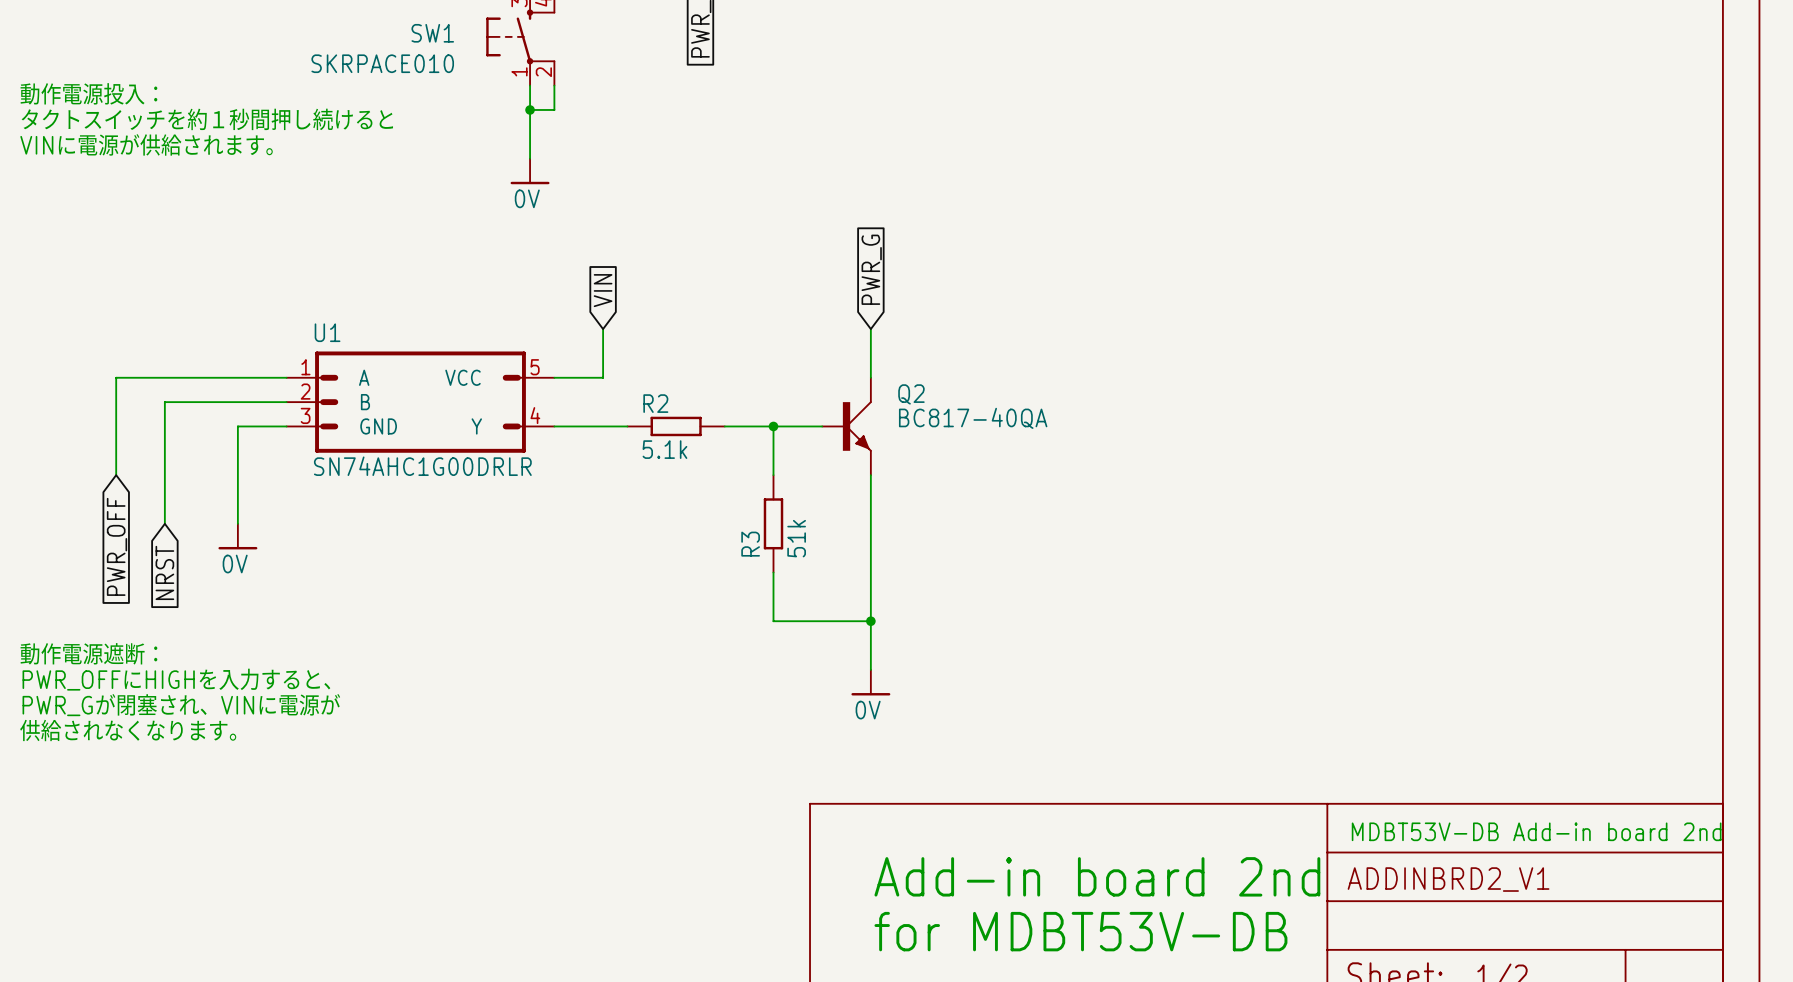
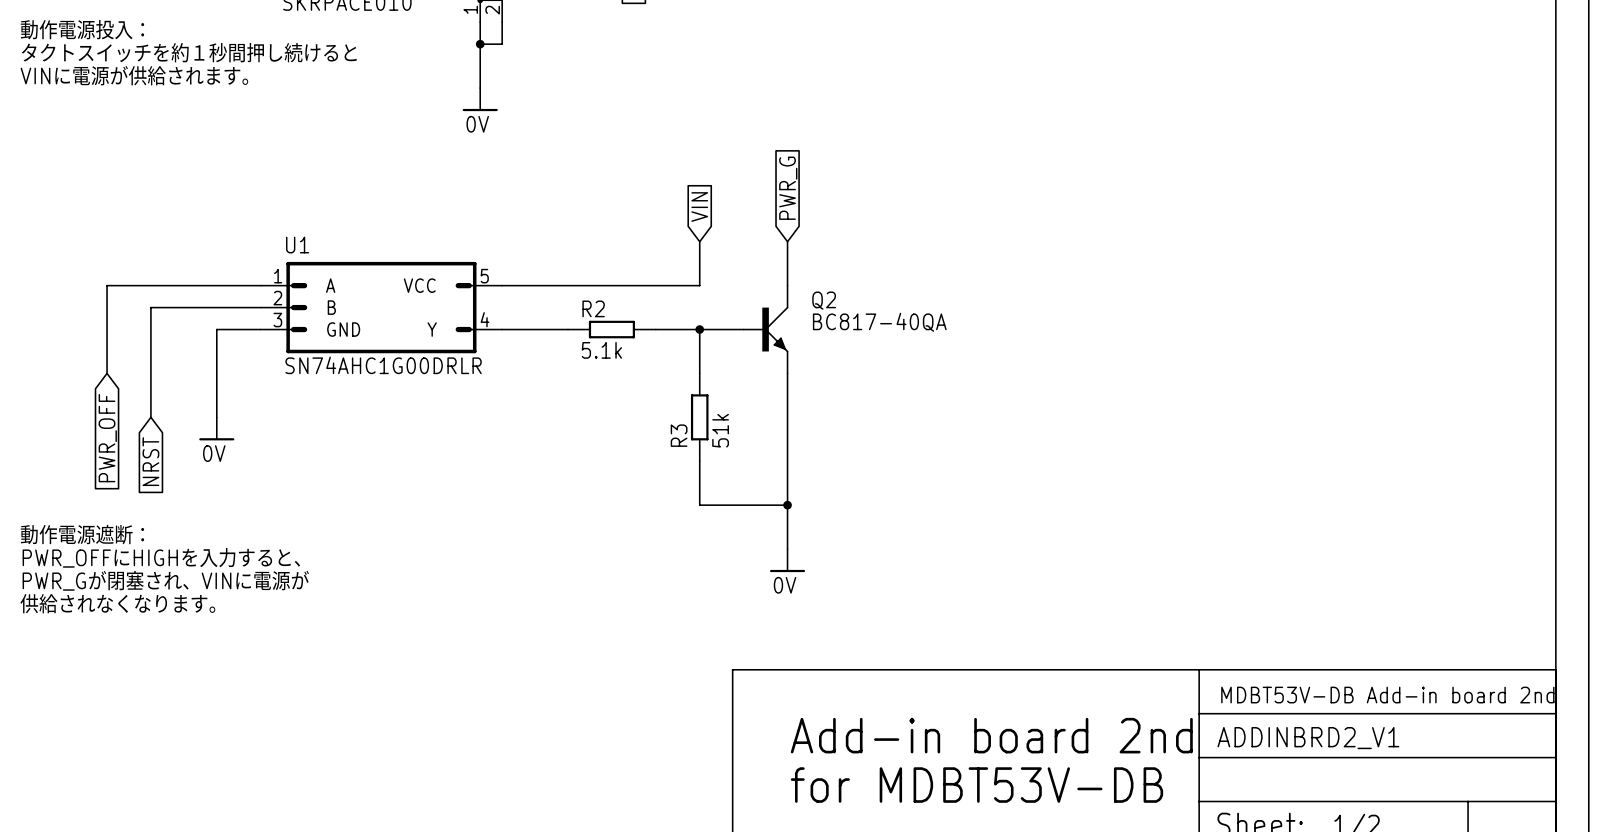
global label position: VIN (603, 290) -> VIN (699, 207)
wire: (603, 329) (603, 377) -> (699, 241) (699, 285) (546, 285)

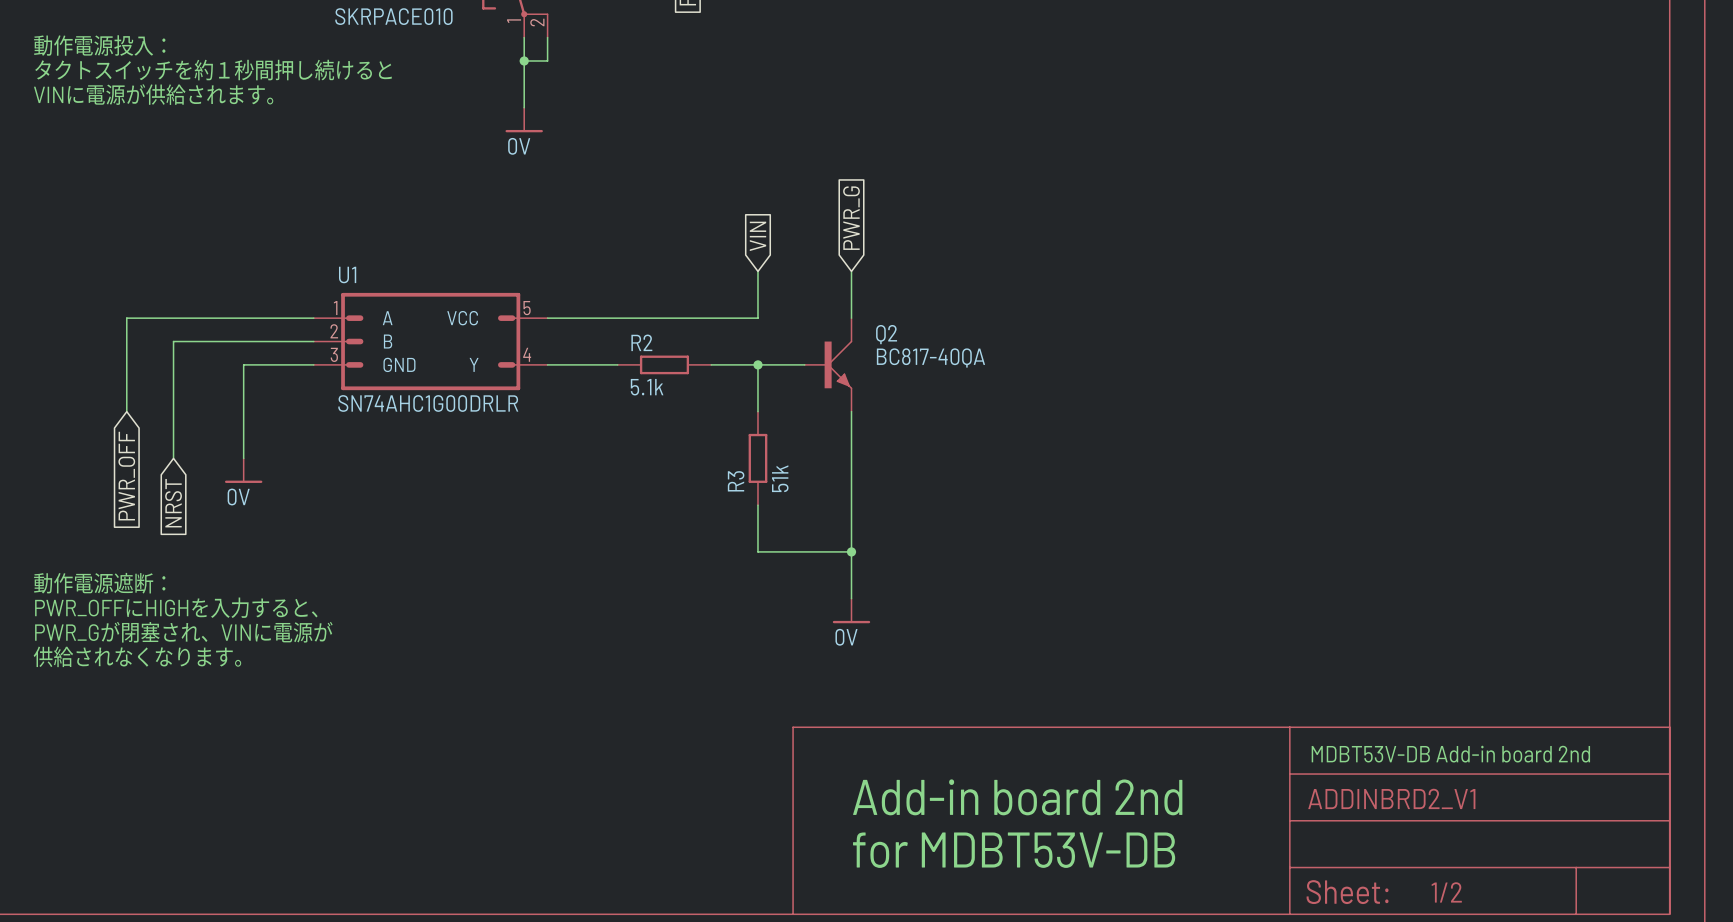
U1 symbol: [260, 261, 503, 354] -> [313, 292, 548, 391]

